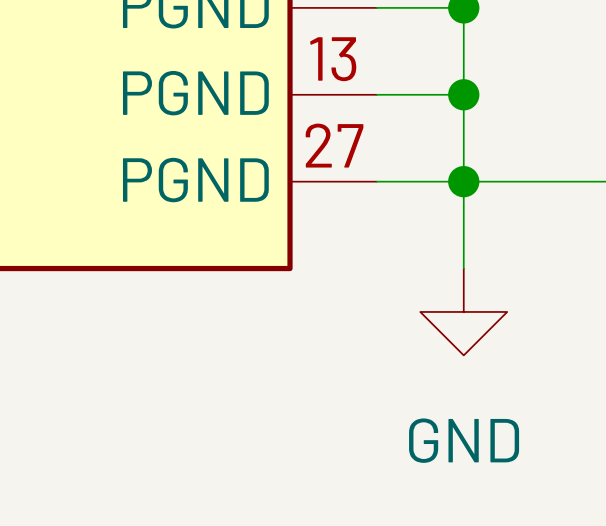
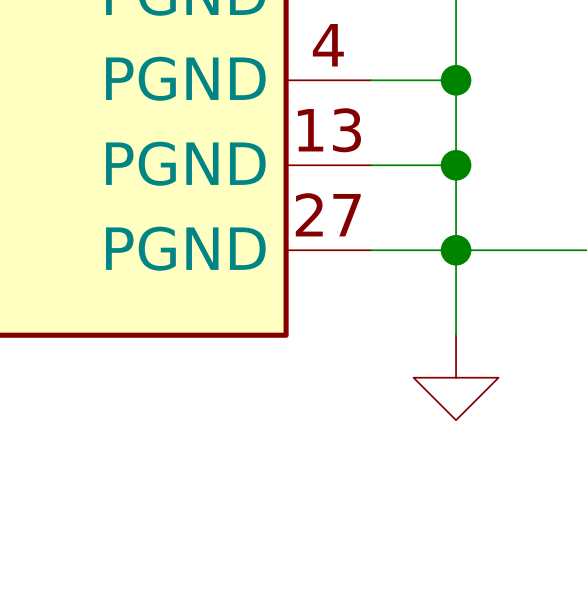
power symbol text: GND (464, 440) -> none

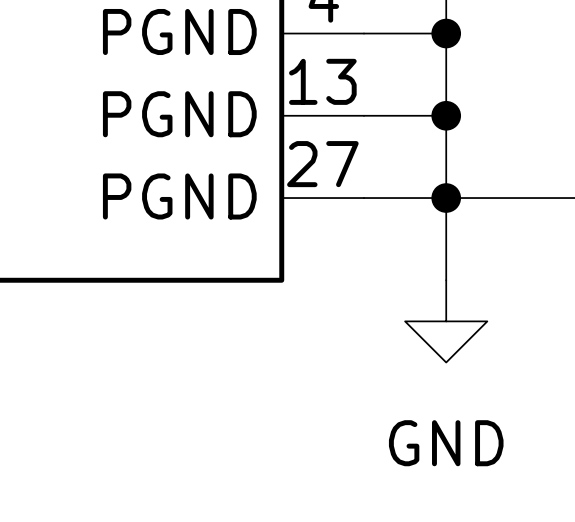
power symbol text: none -> GND (446, 443)

